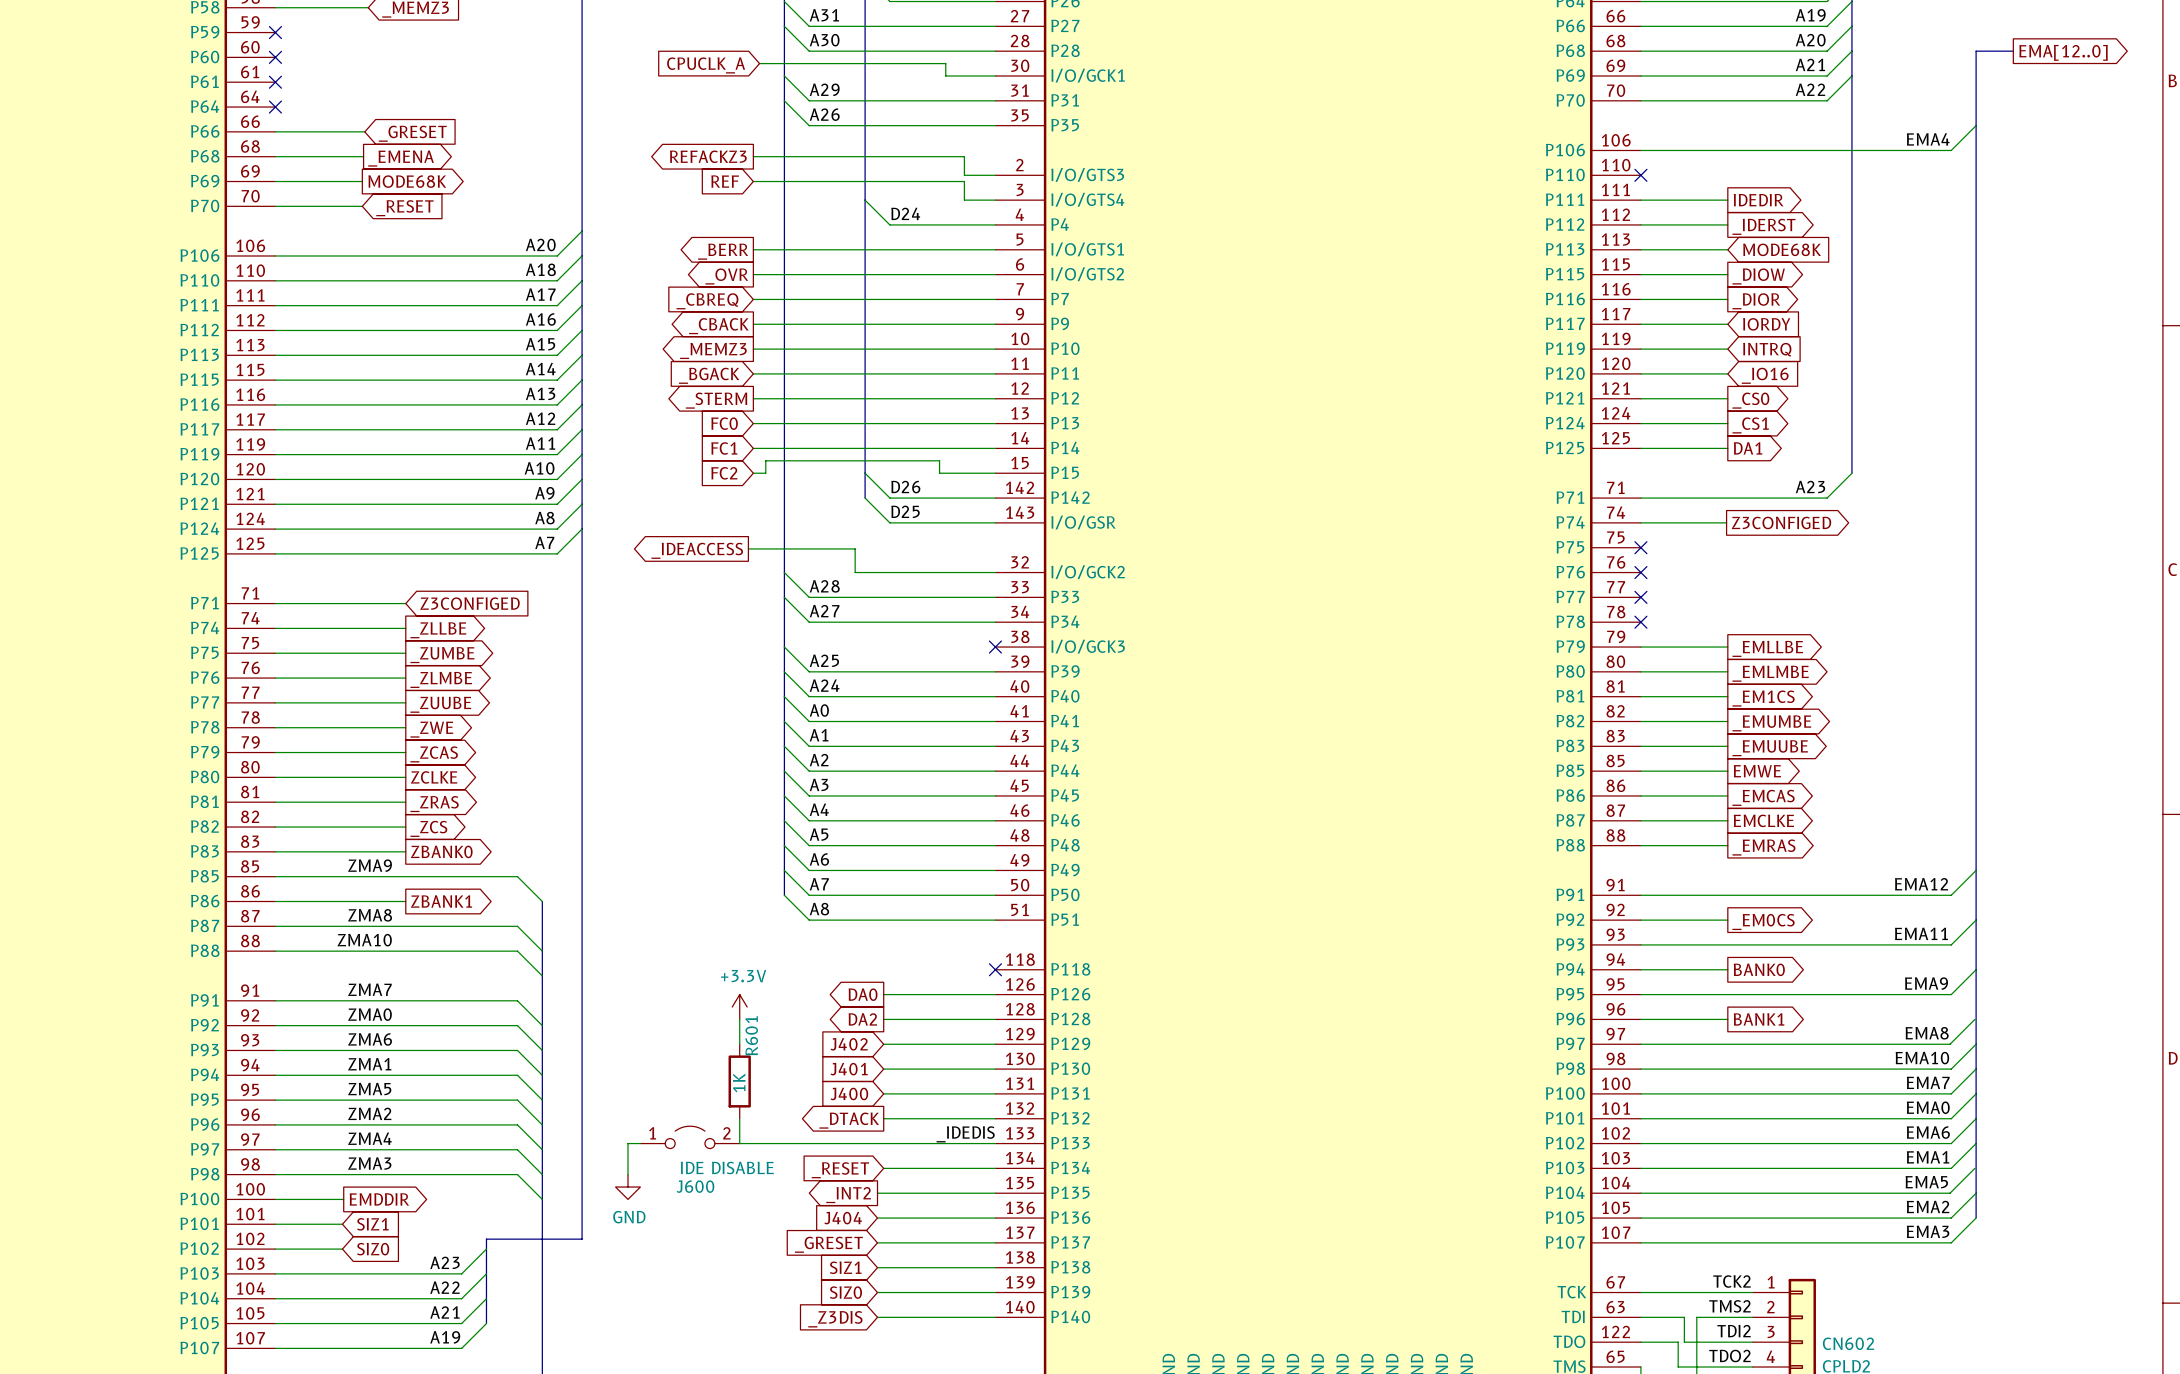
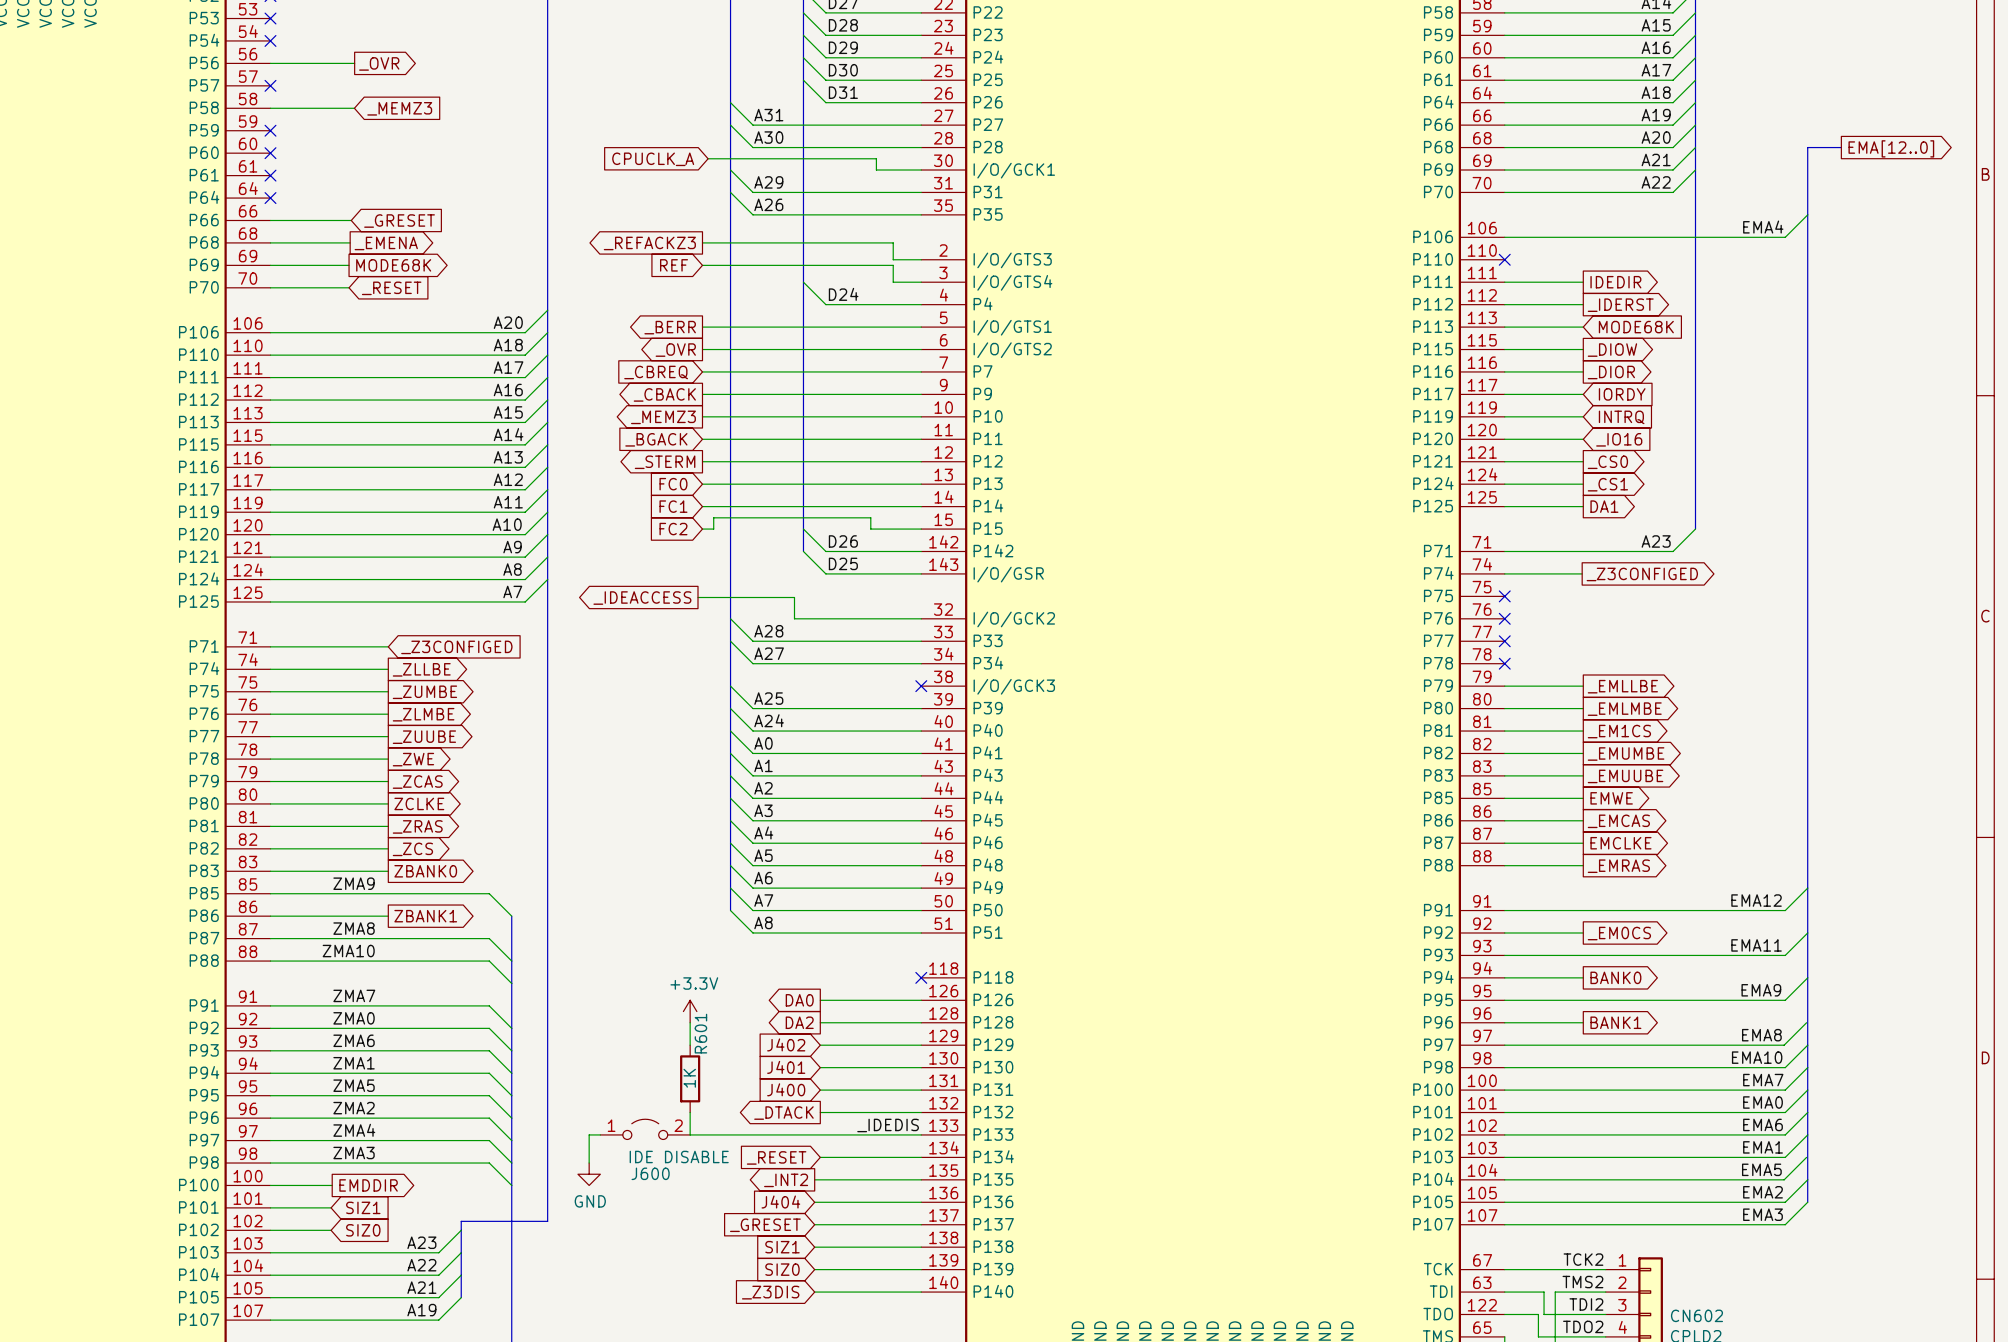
global label: REFACKZ3 (708, 156) -> _REFACKZ3 (649, 243)
global label: Z3CONFIGED (1781, 522) -> _Z3CONFIGED (1642, 574)
global label: Z3CONFIGED (469, 603) -> _Z3CONFIGED (456, 647)

